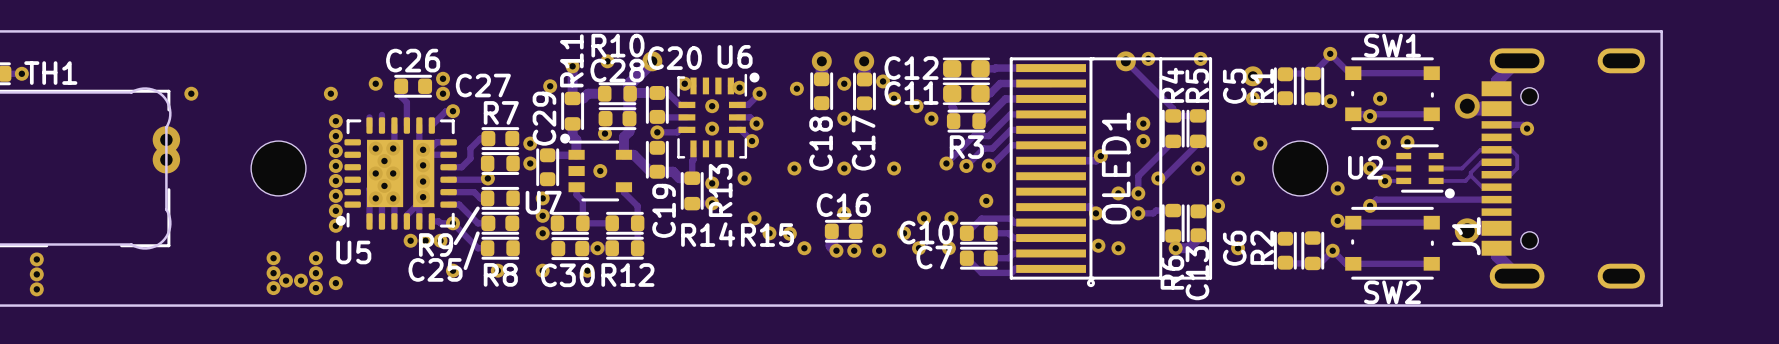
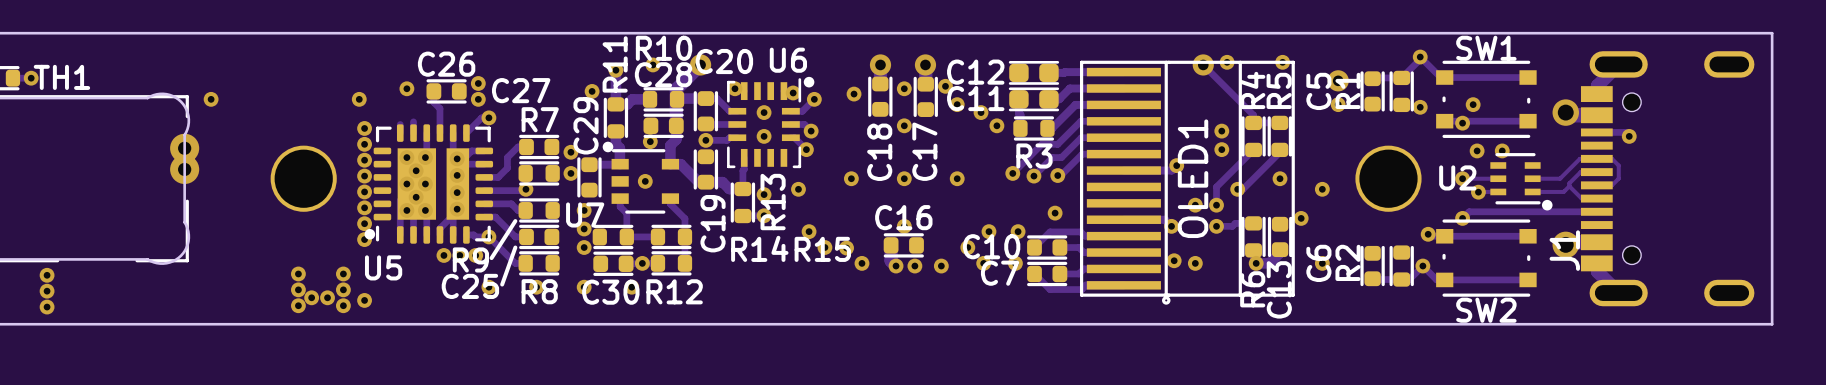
part footprint: [251, 141, 306, 196] -> [270, 145, 337, 212]
part footprint: [1272, 141, 1328, 196] -> [1355, 145, 1422, 212]
via: (1260, 143) -> none
via: (1337, 188) -> none

